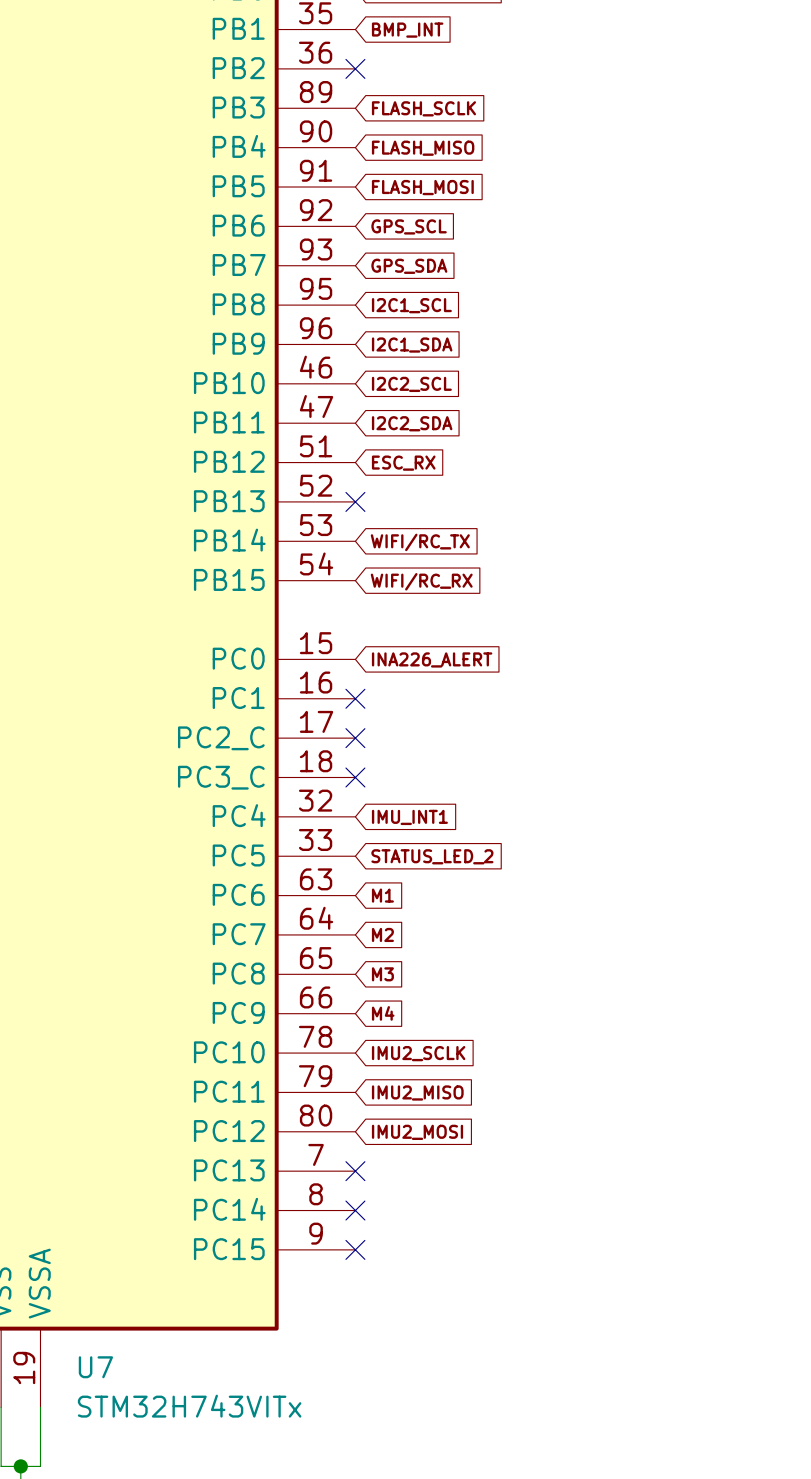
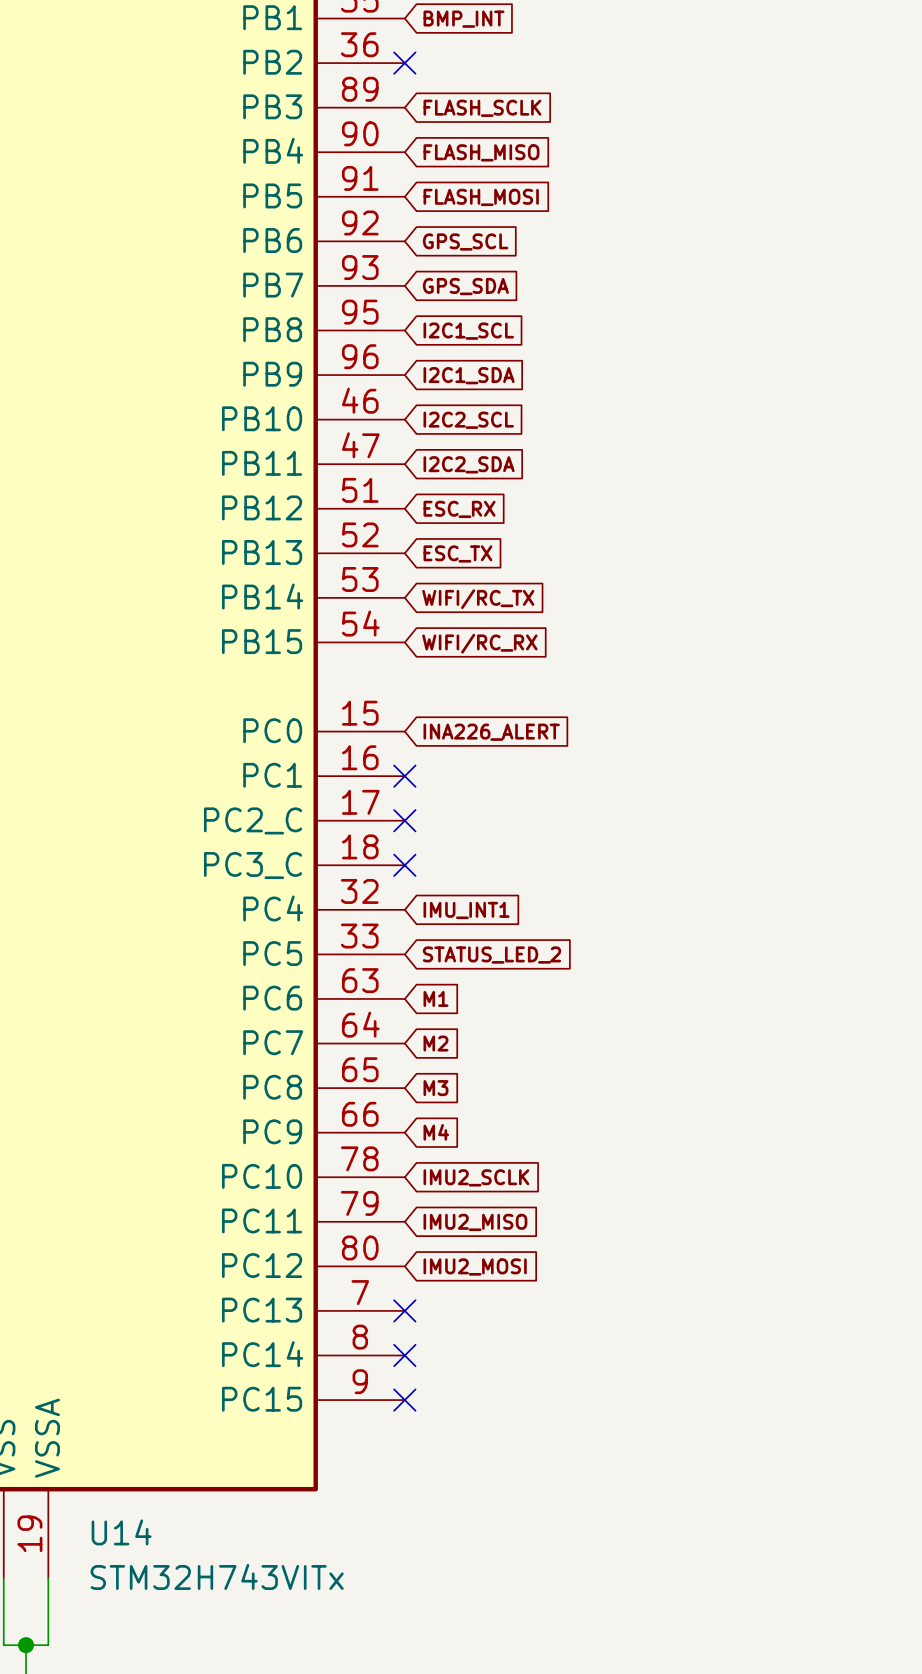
no-connect mark: (355, 501) -> none
global label: none -> ESC_TX (457, 553)
U7 name: U7 (95, 1367) -> U14 (121, 1532)

